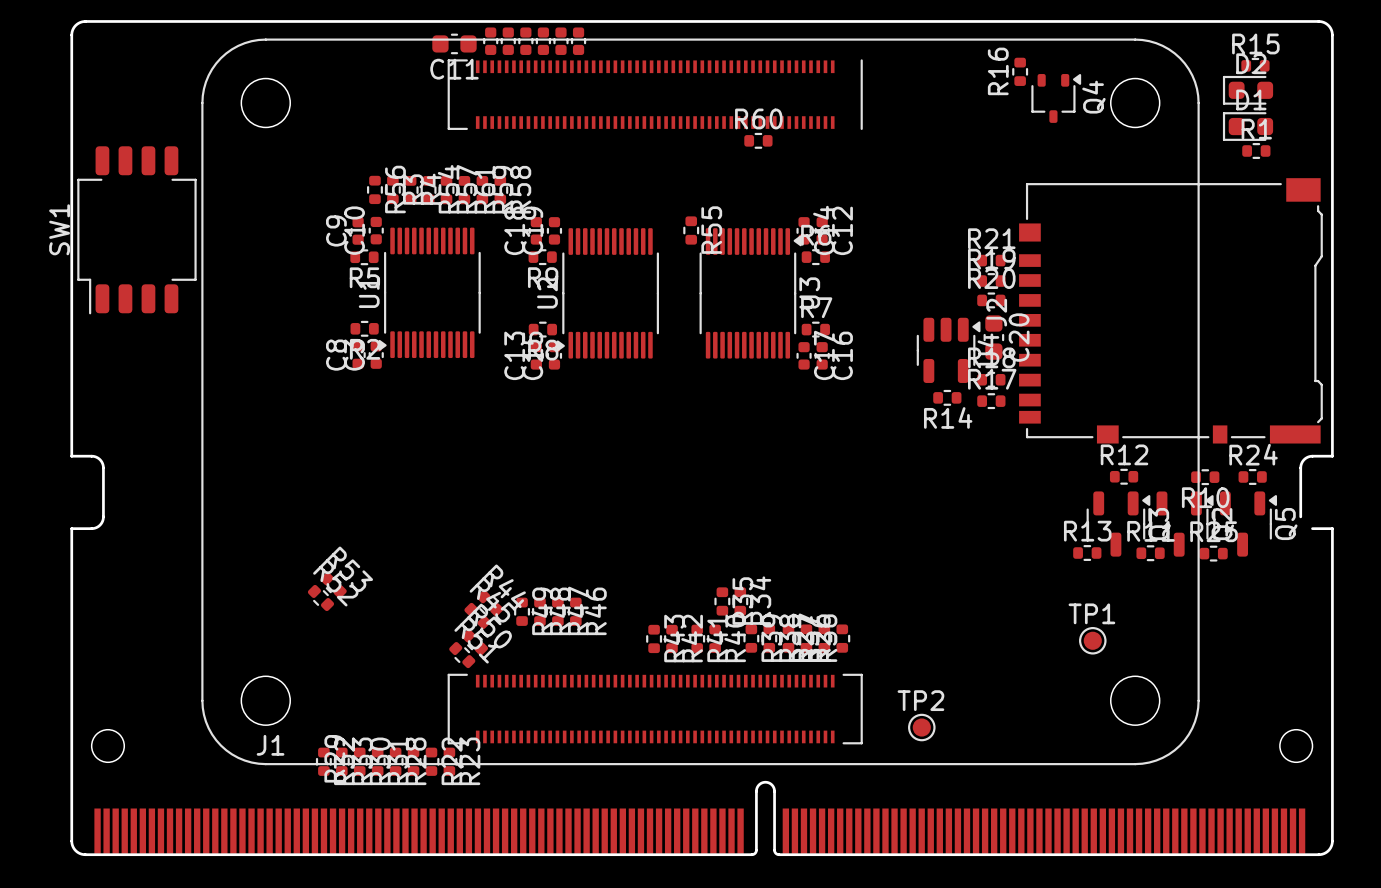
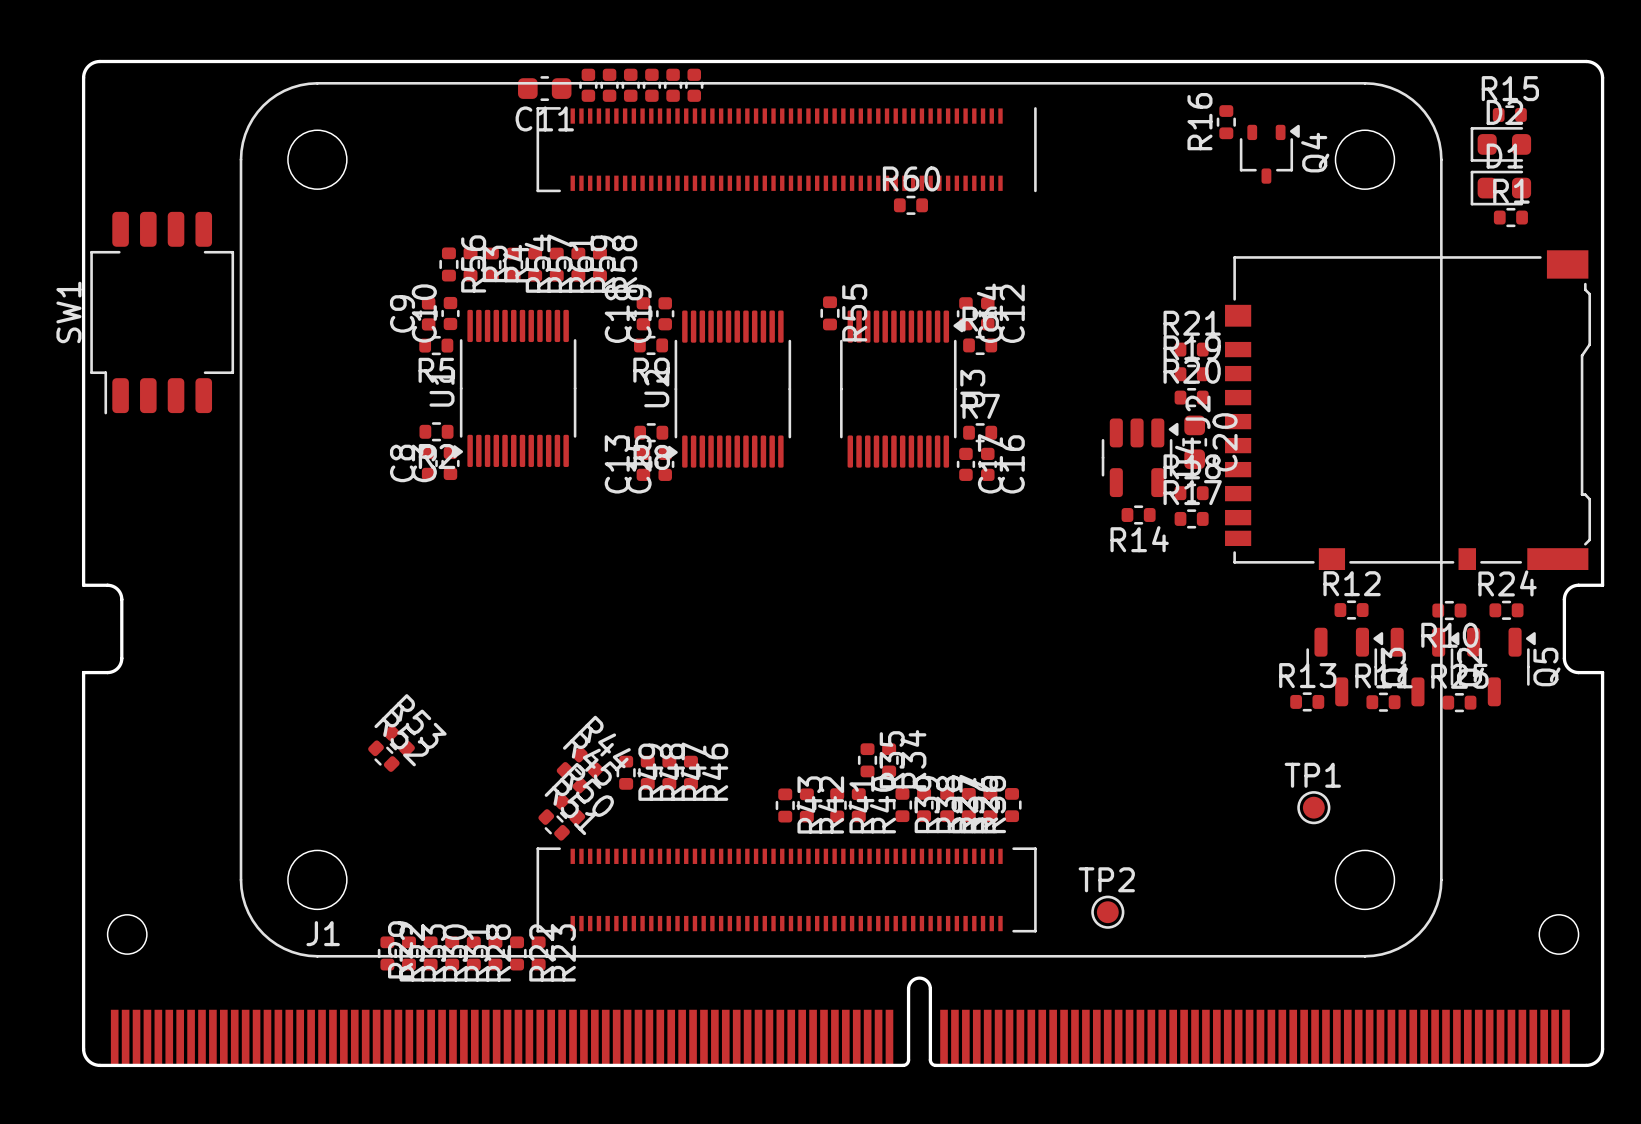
board edge: none -> (1564, 658) (1568, 668) (1578, 672)

